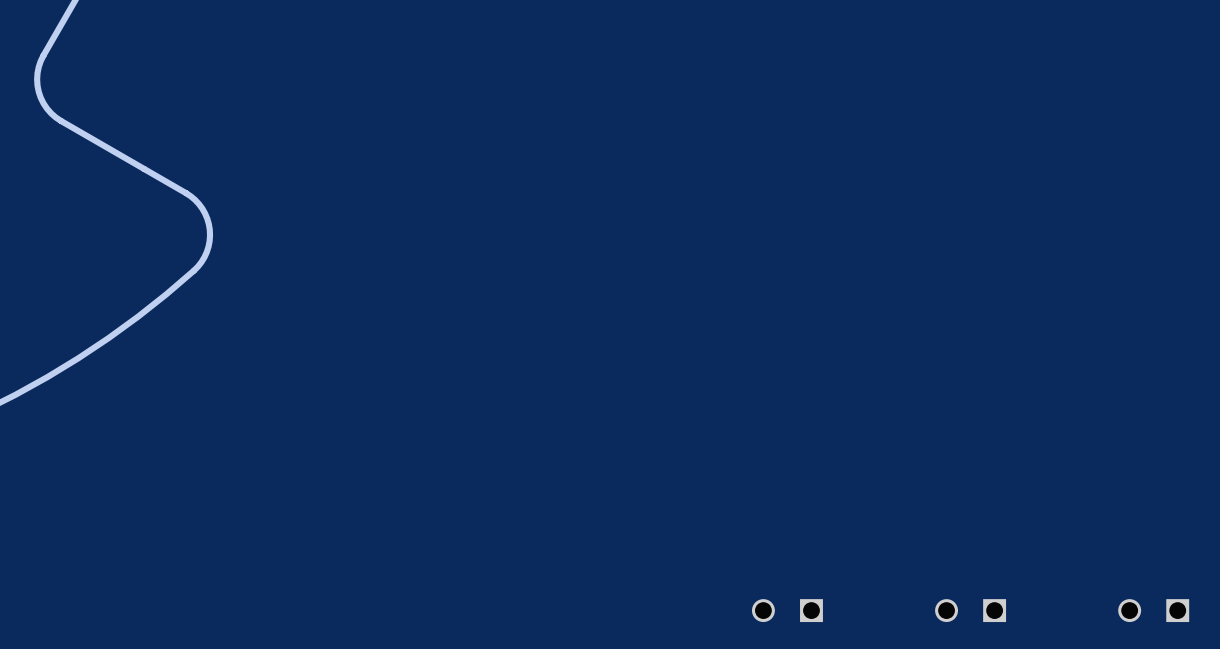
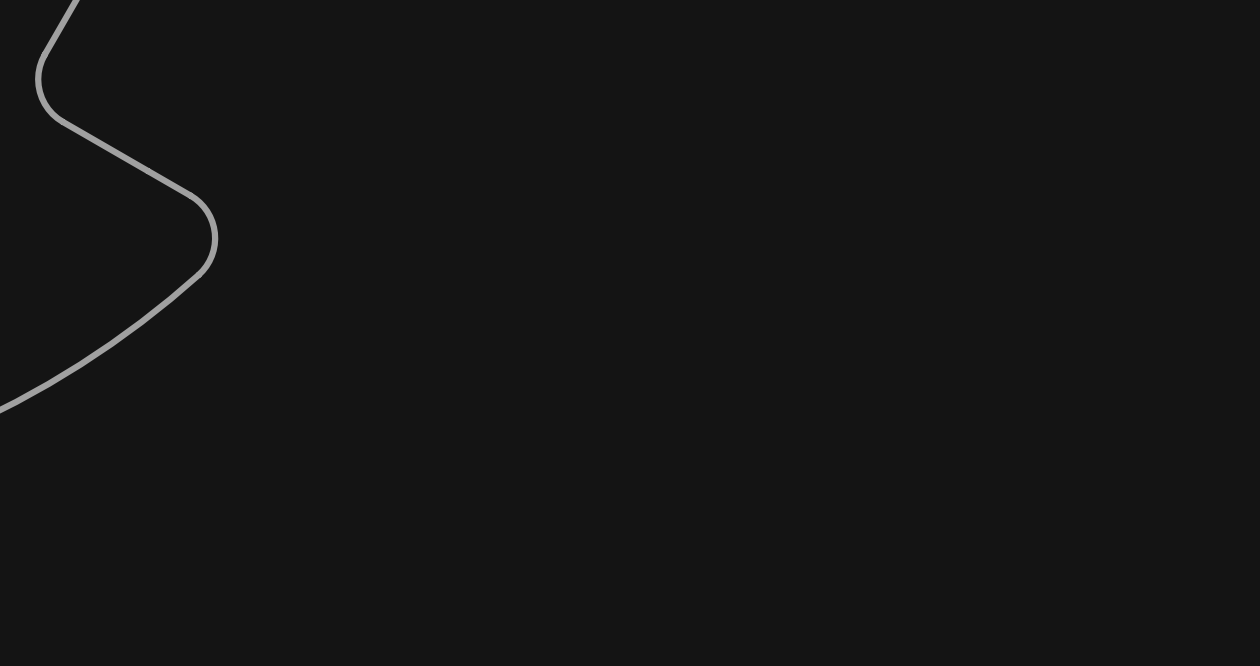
part: (787, 610) -> none
part: (970, 610) -> none
part: (1153, 610) -> none

